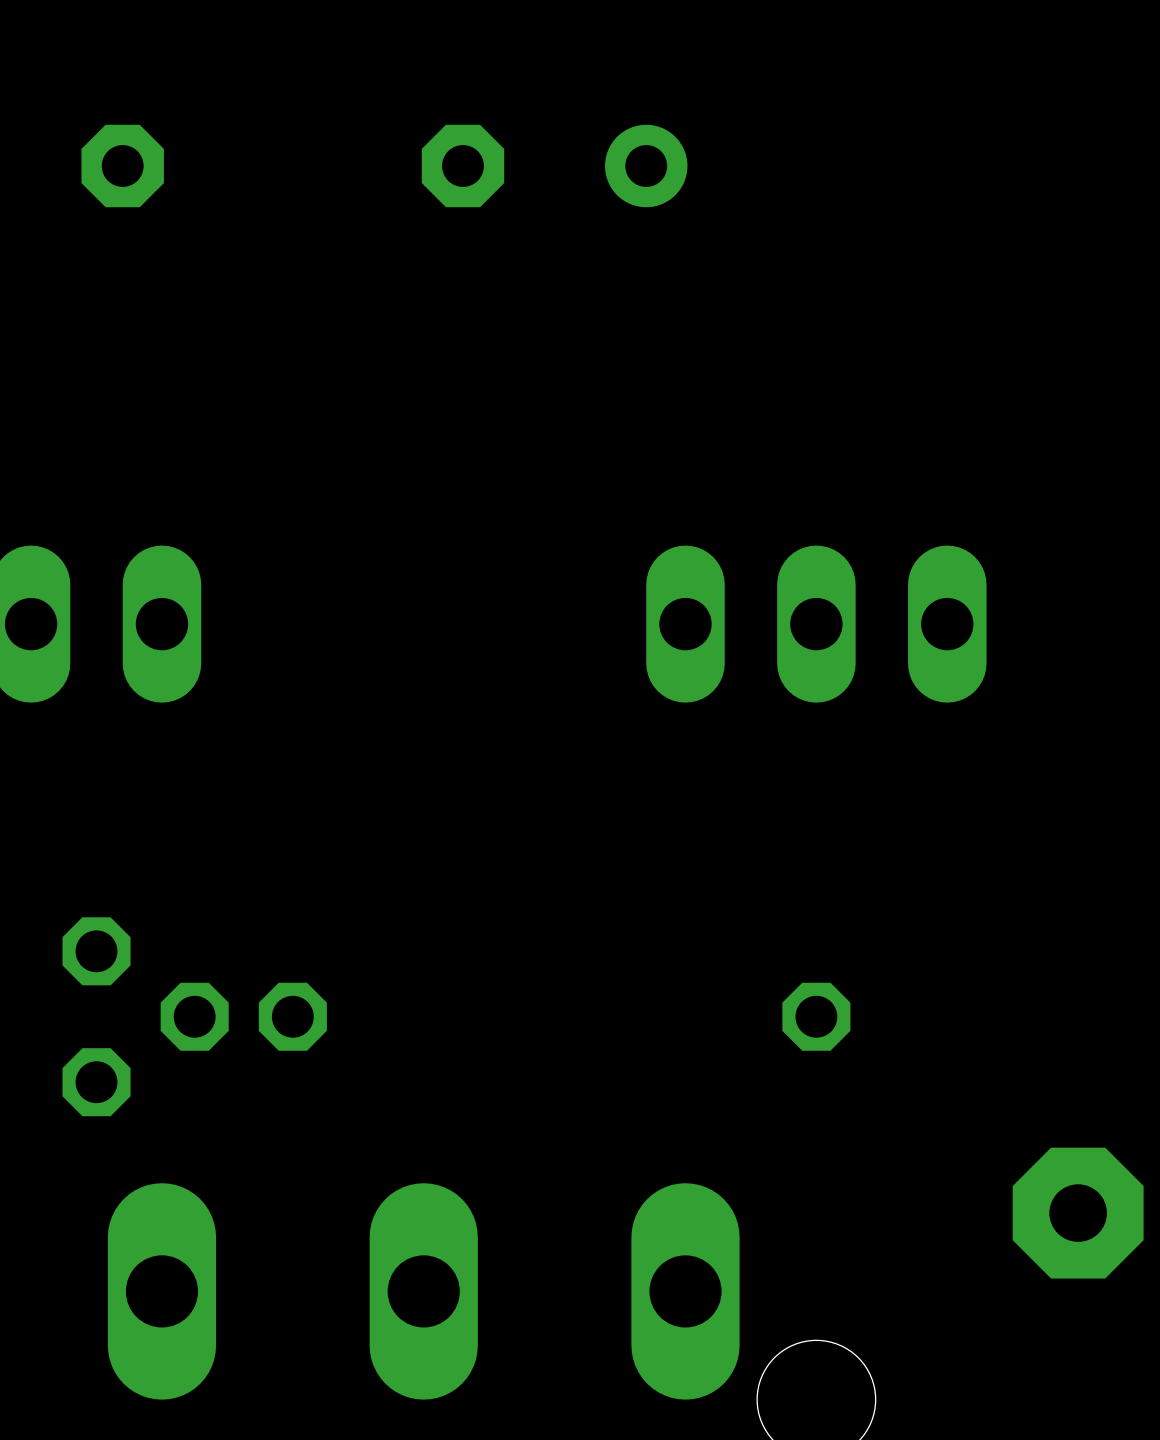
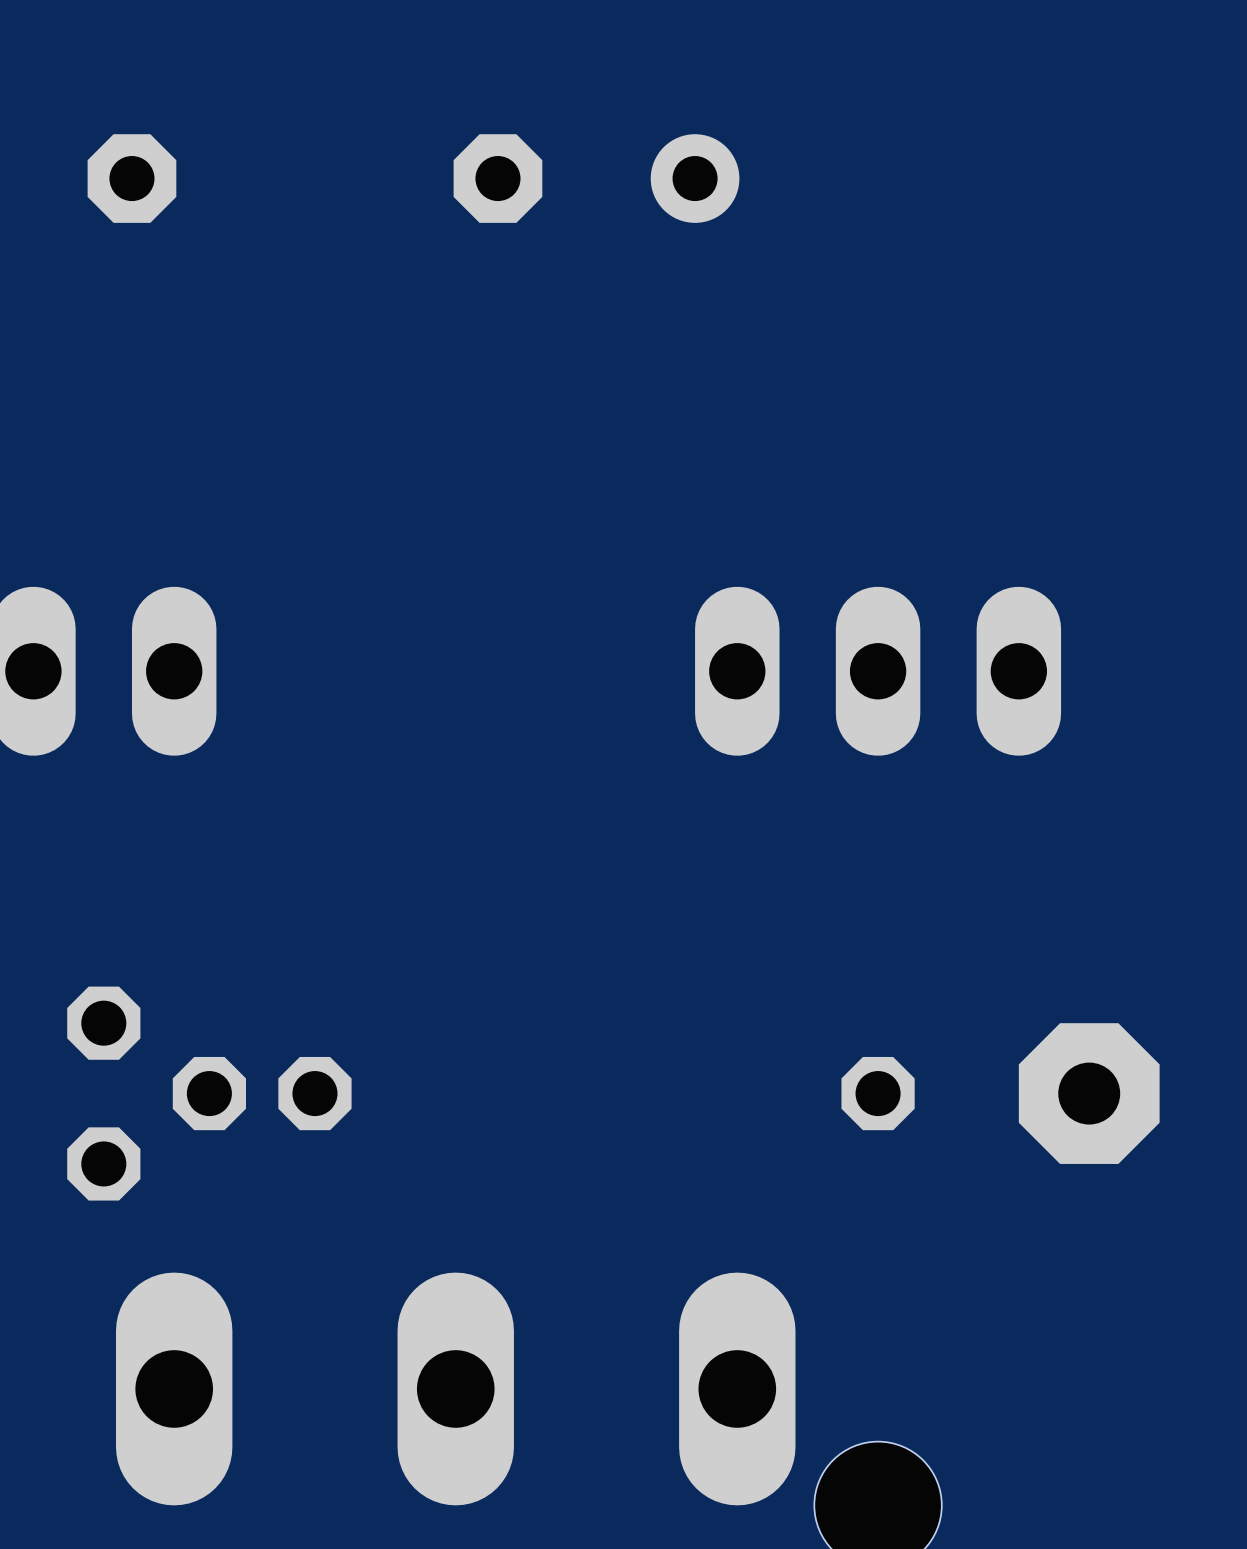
part position: (1078, 1213) -> (1089, 1093)

